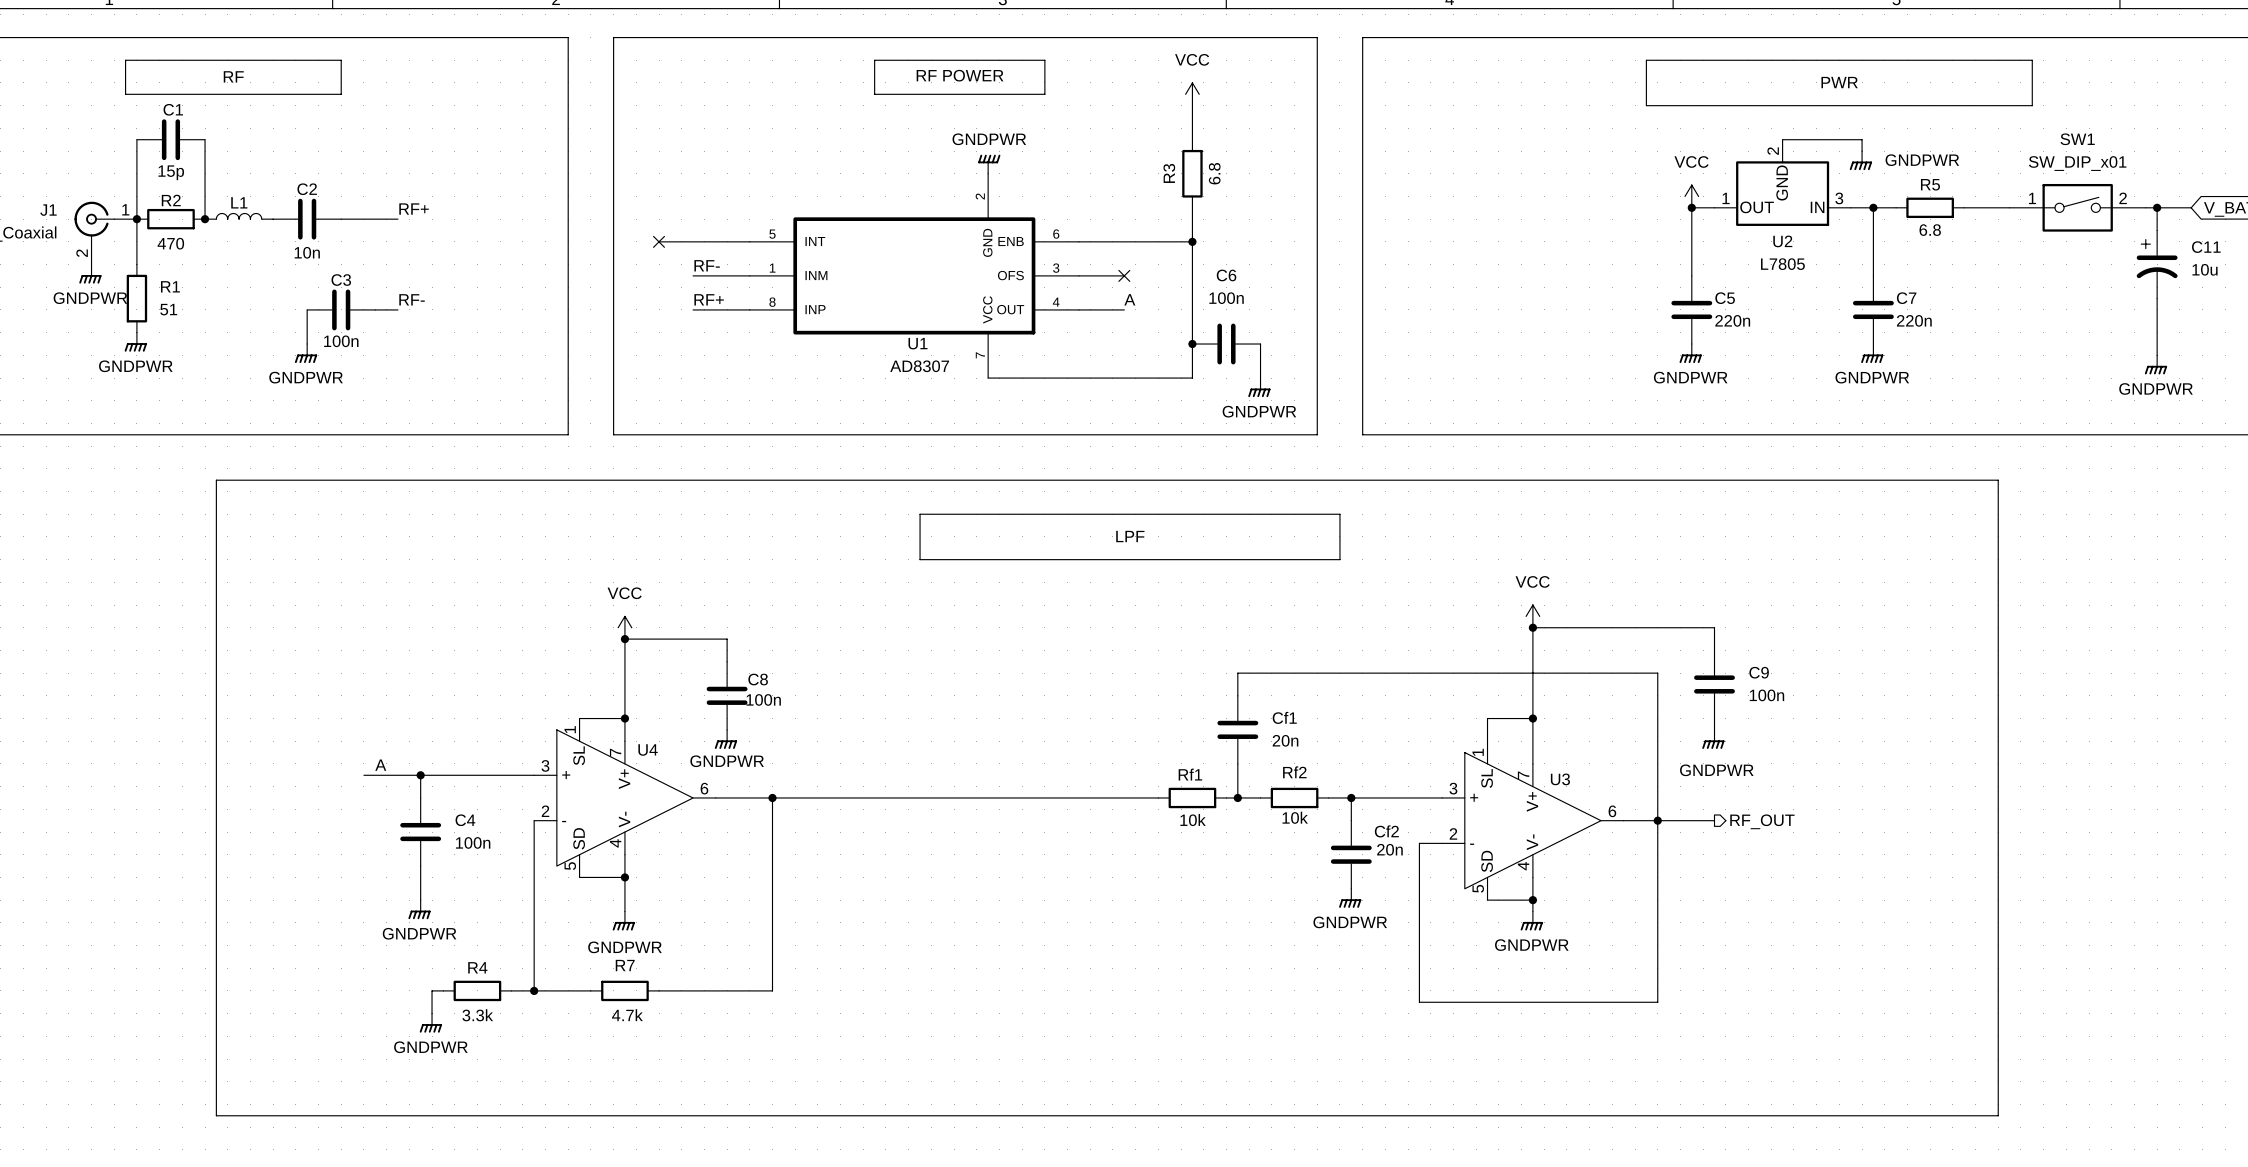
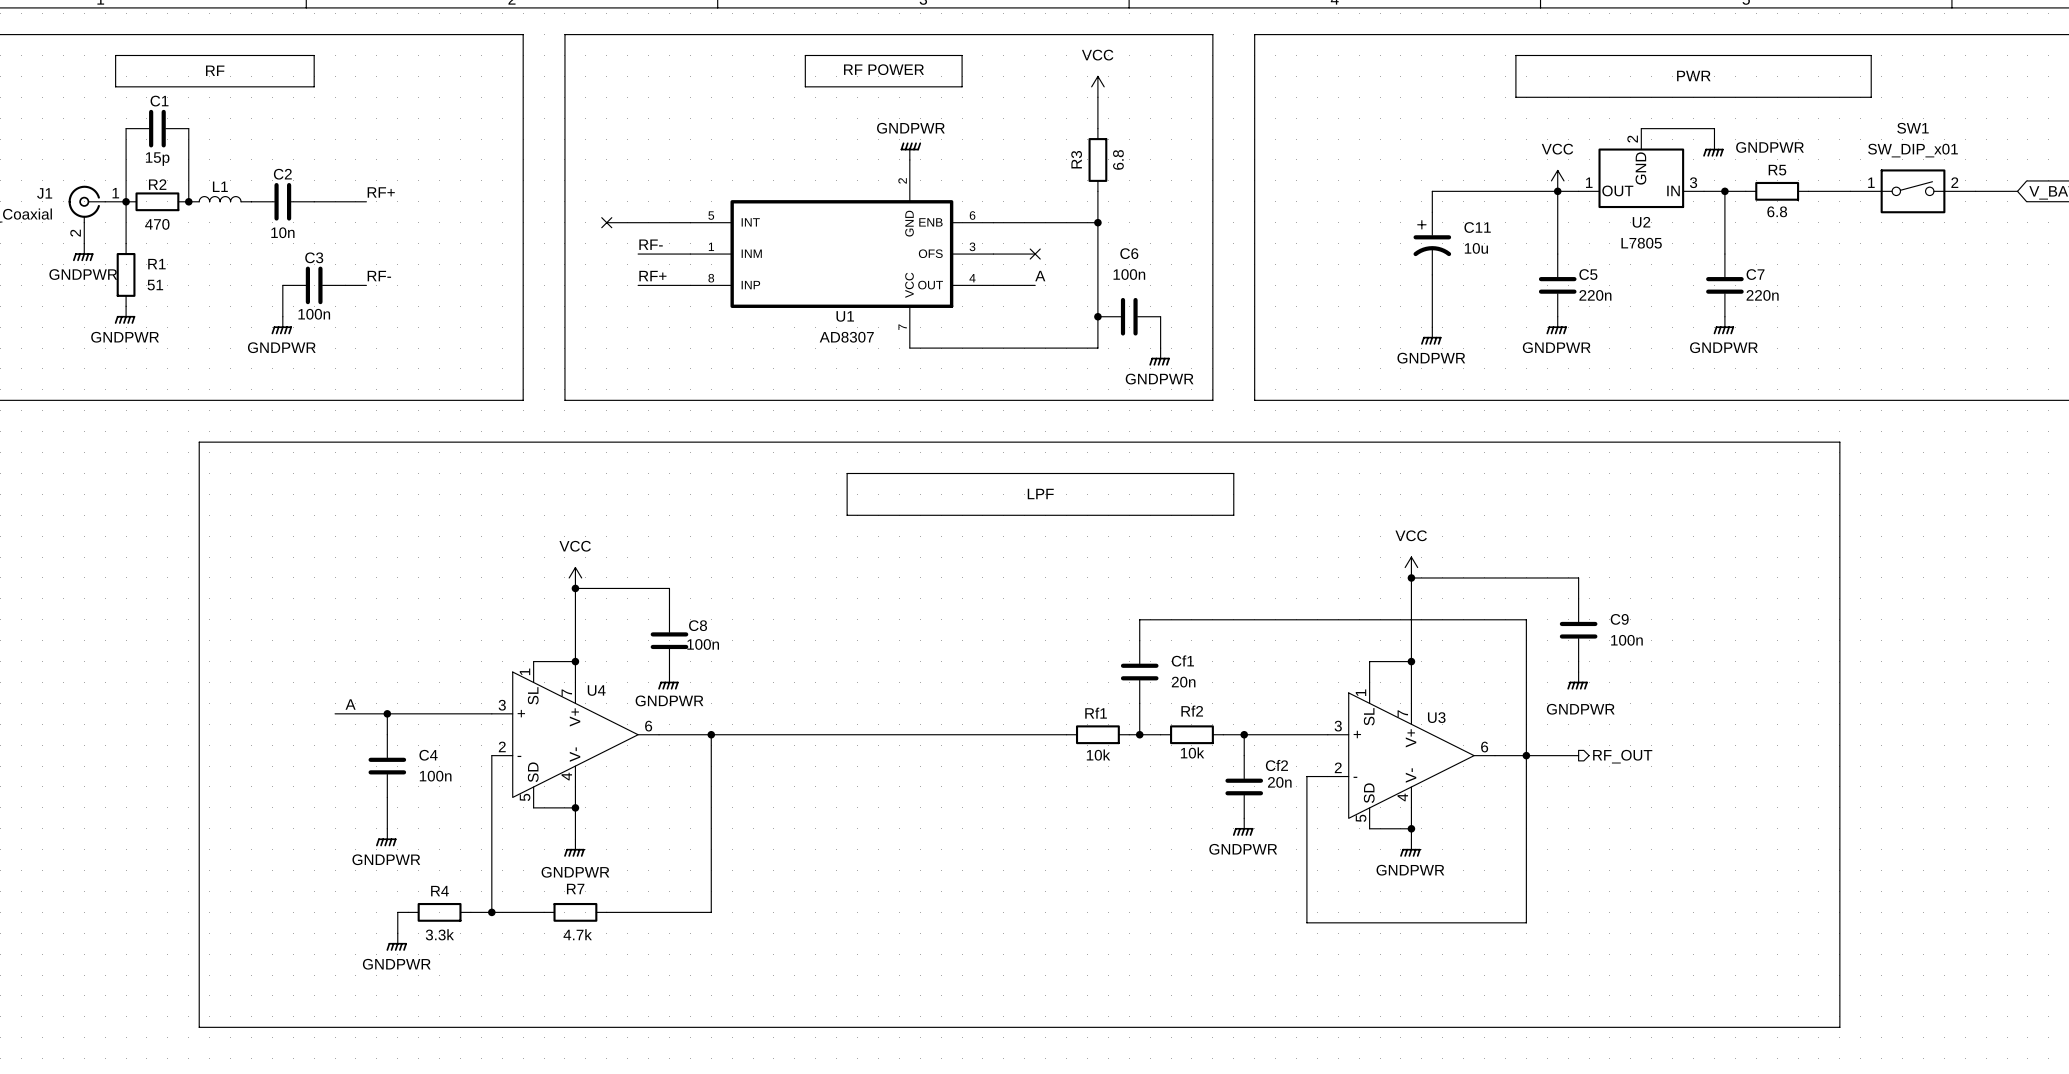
wire: none -> (1557, 191) (1432, 191) (1432, 212)
wire: (2157, 207) (2157, 230) -> none
junction: (2157, 207) -> none
C11 position: (2157, 264) -> (1432, 243)
wire: none -> (1432, 274) (1432, 327)
wire: (2157, 298) (2157, 355) -> none
power symbol: none -> GNDPWR (1431, 335)
power symbol: GNDPWR (2156, 364) -> none

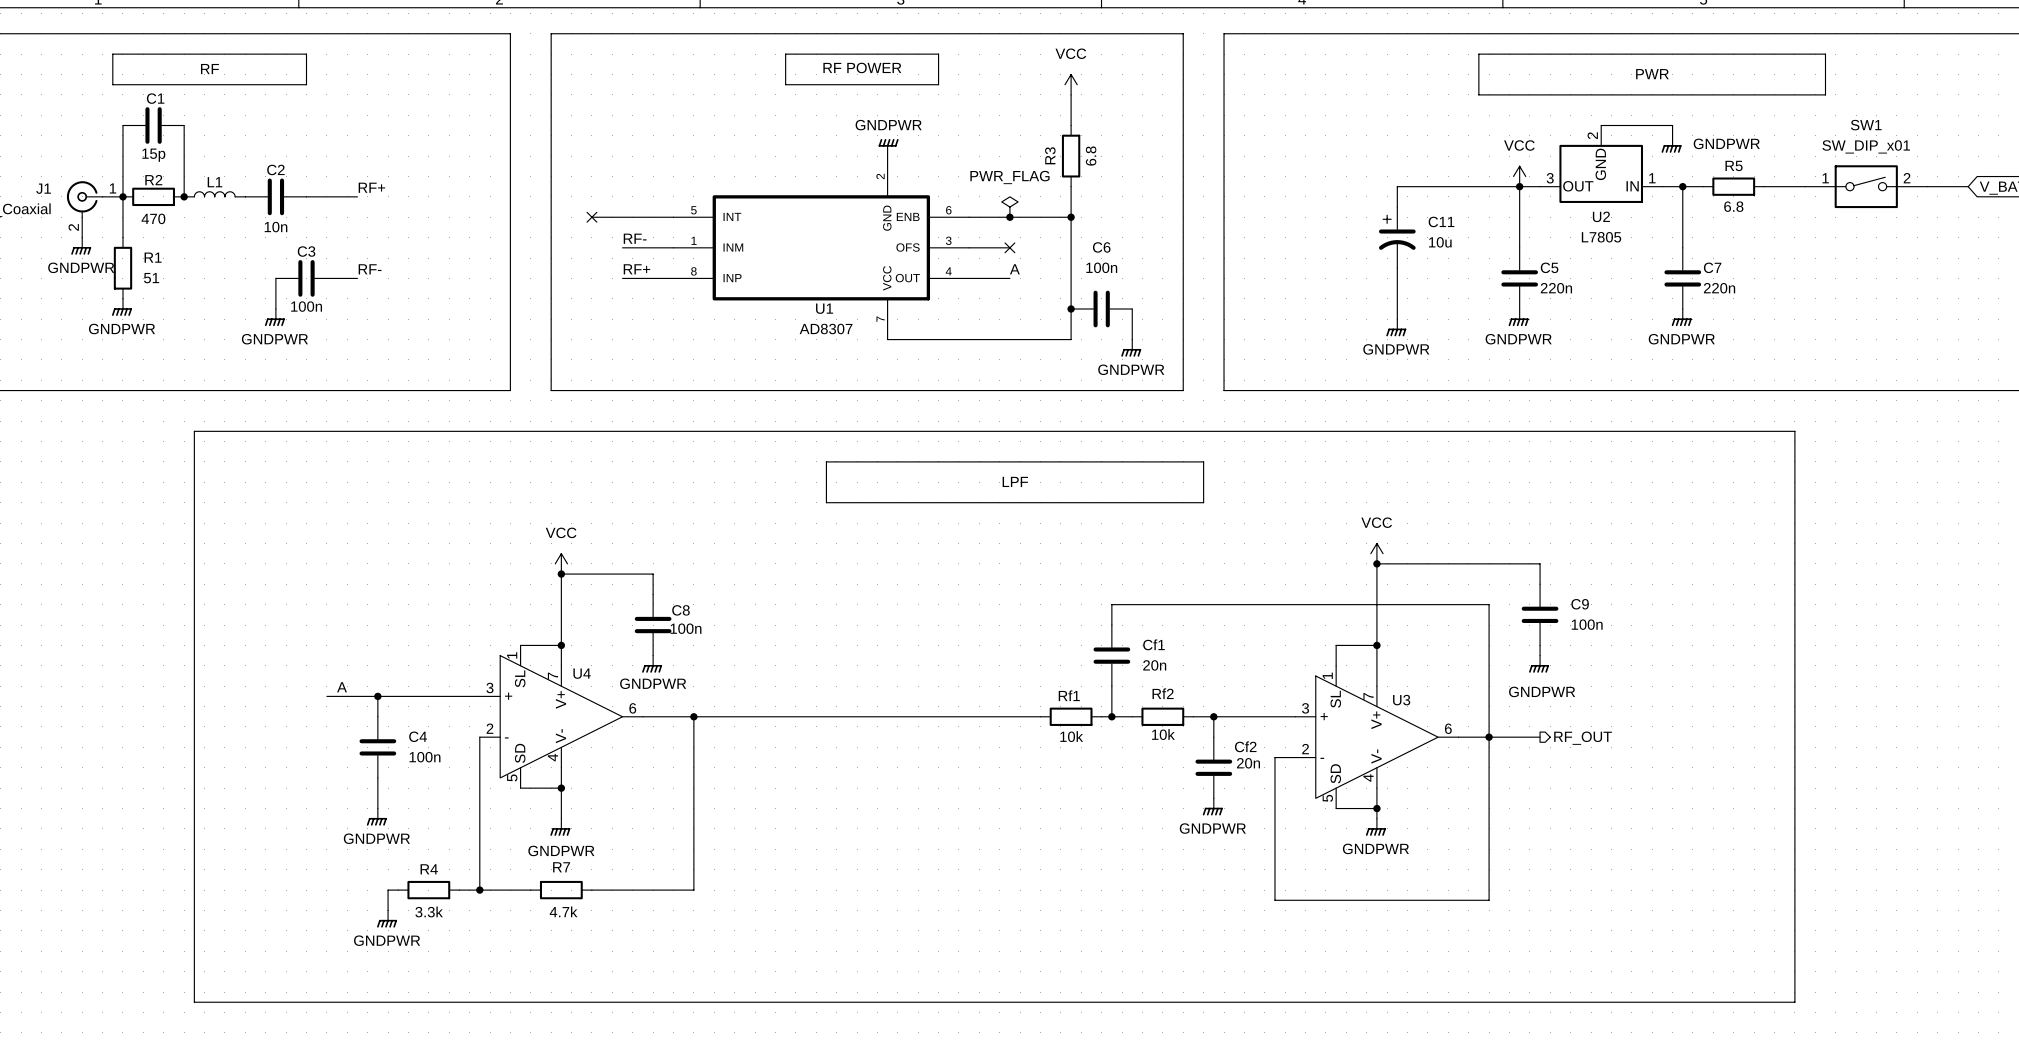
U2 pin number: 1 (1589, 182) -> 3 (1550, 178)
U2 pin number: 3 (1693, 182) -> 1 (1652, 178)
power symbol: none -> PWR_FLAG (1009, 207)
junction: none -> (1009, 217)

